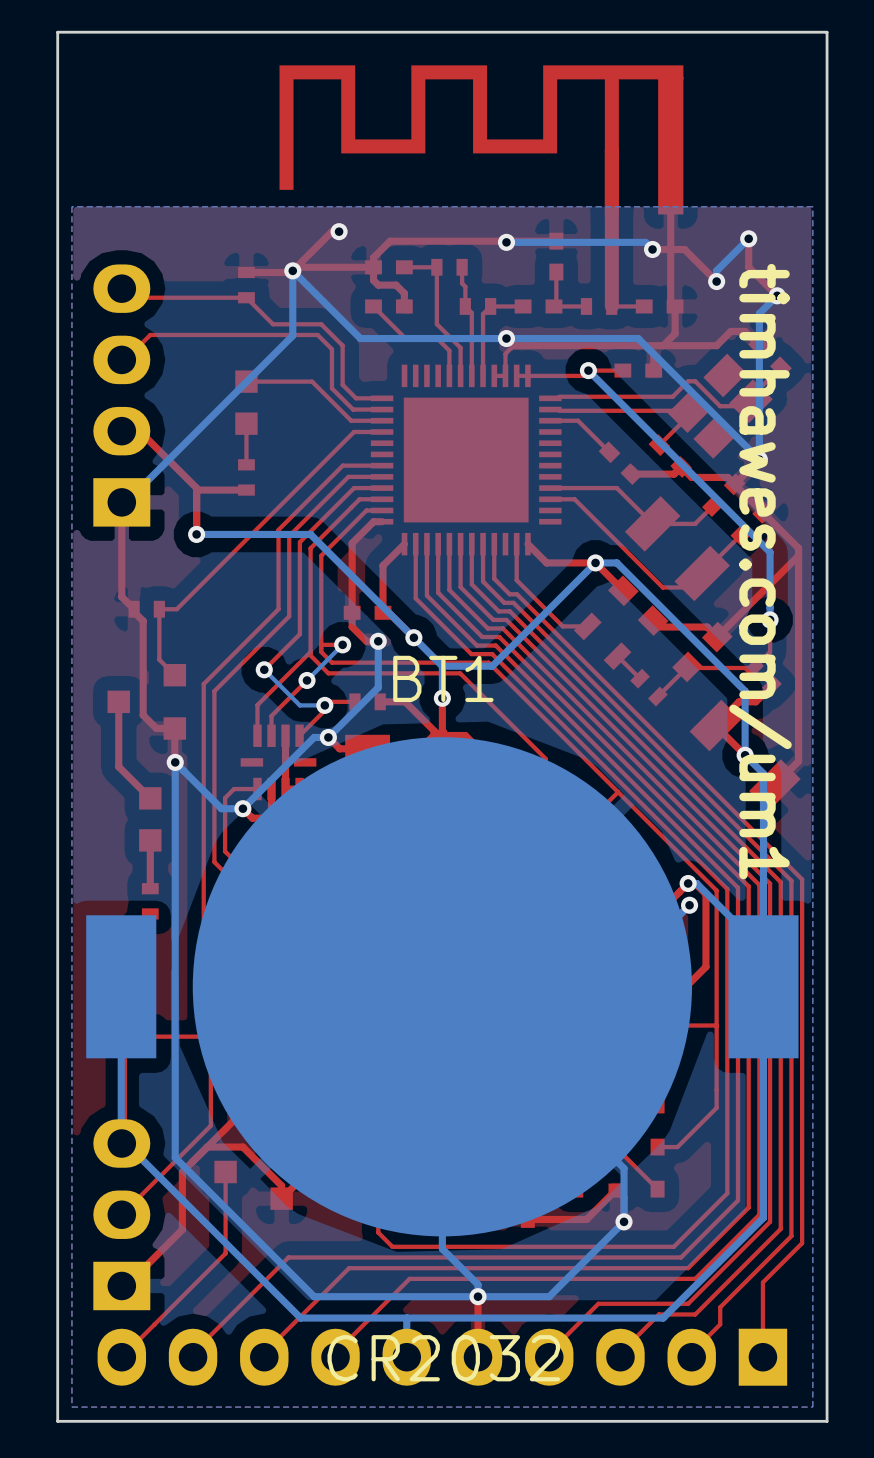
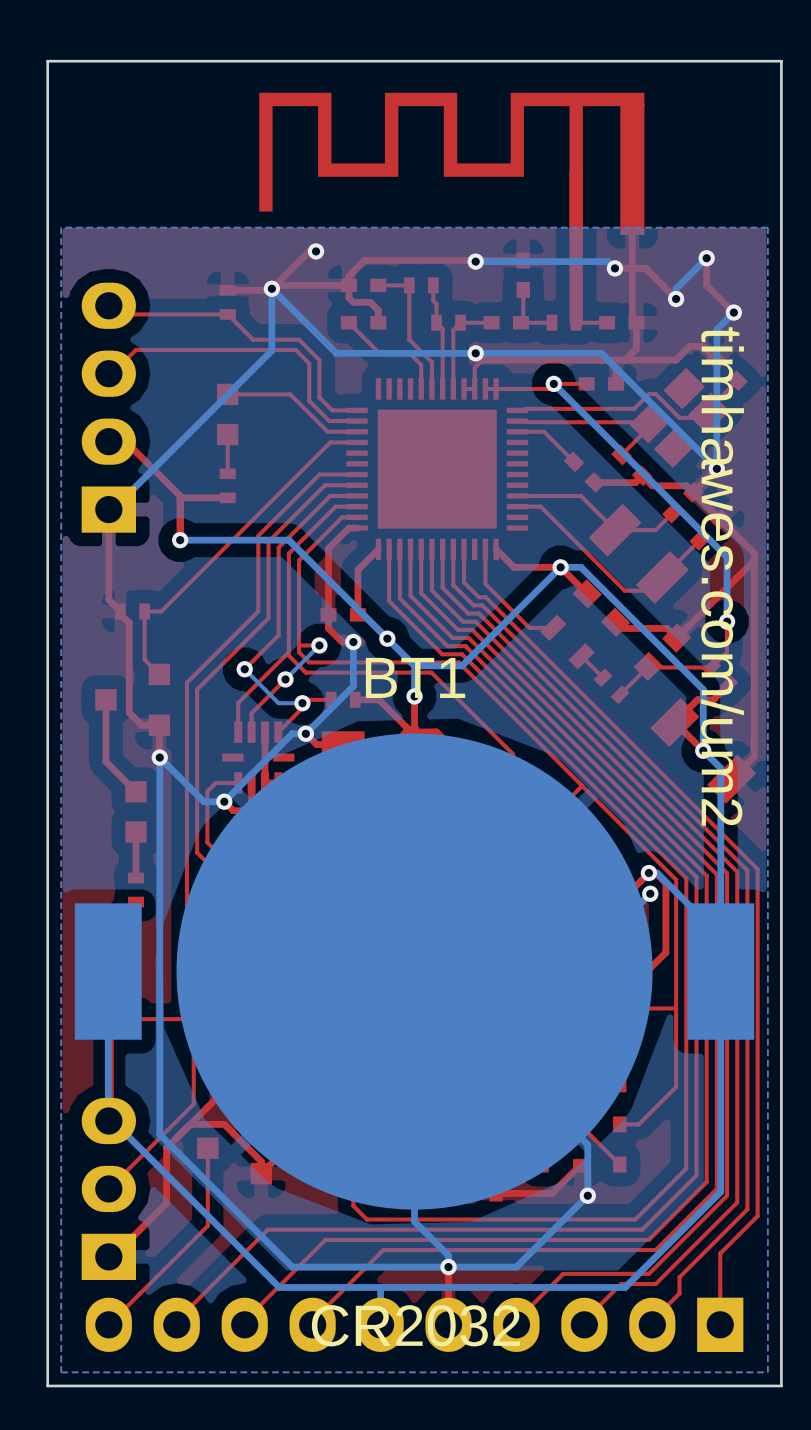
text: timhawes.com/um1 (760, 571) -> timhawes.com/um2 (722, 576)

